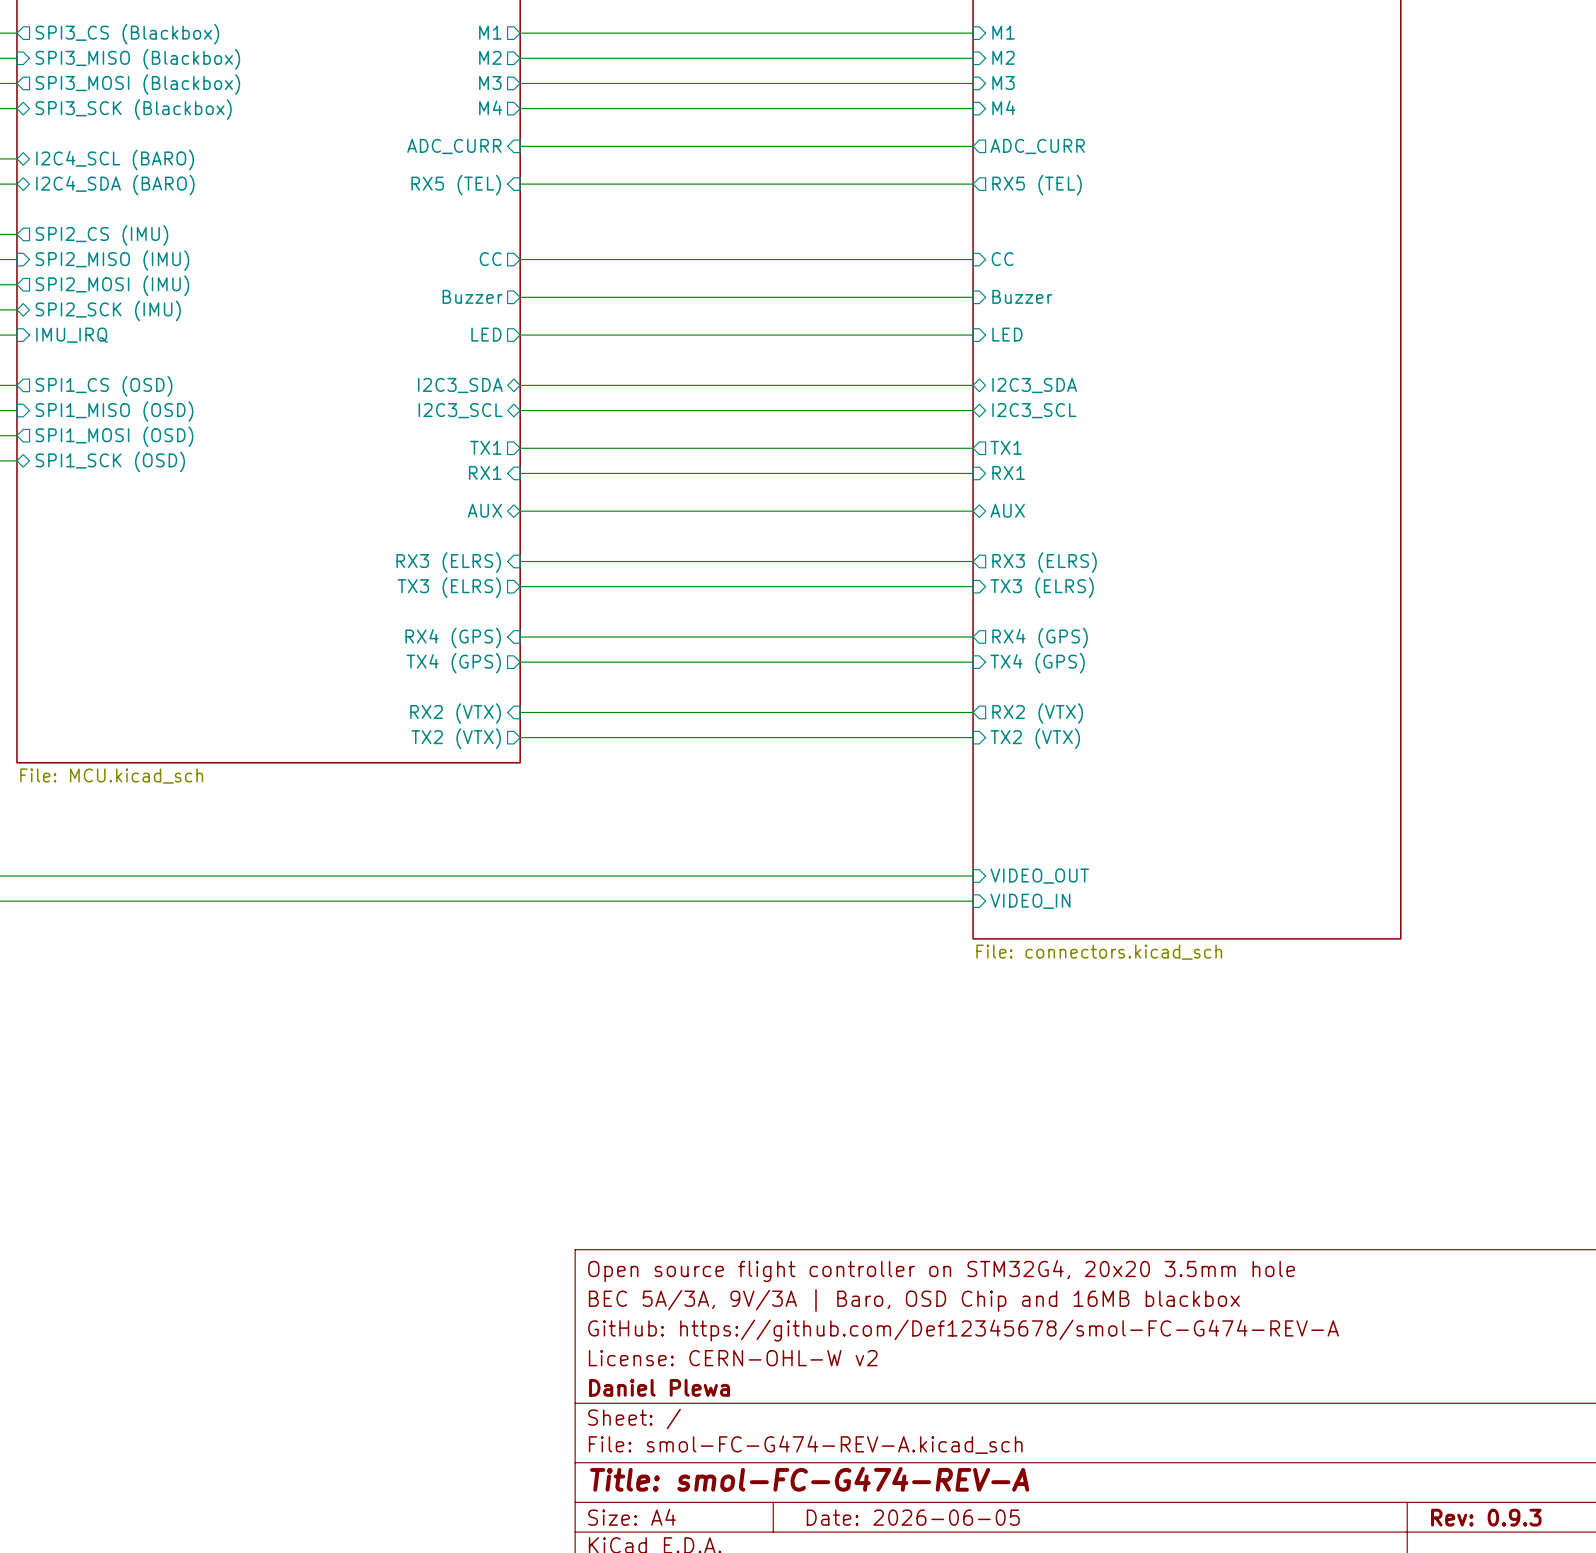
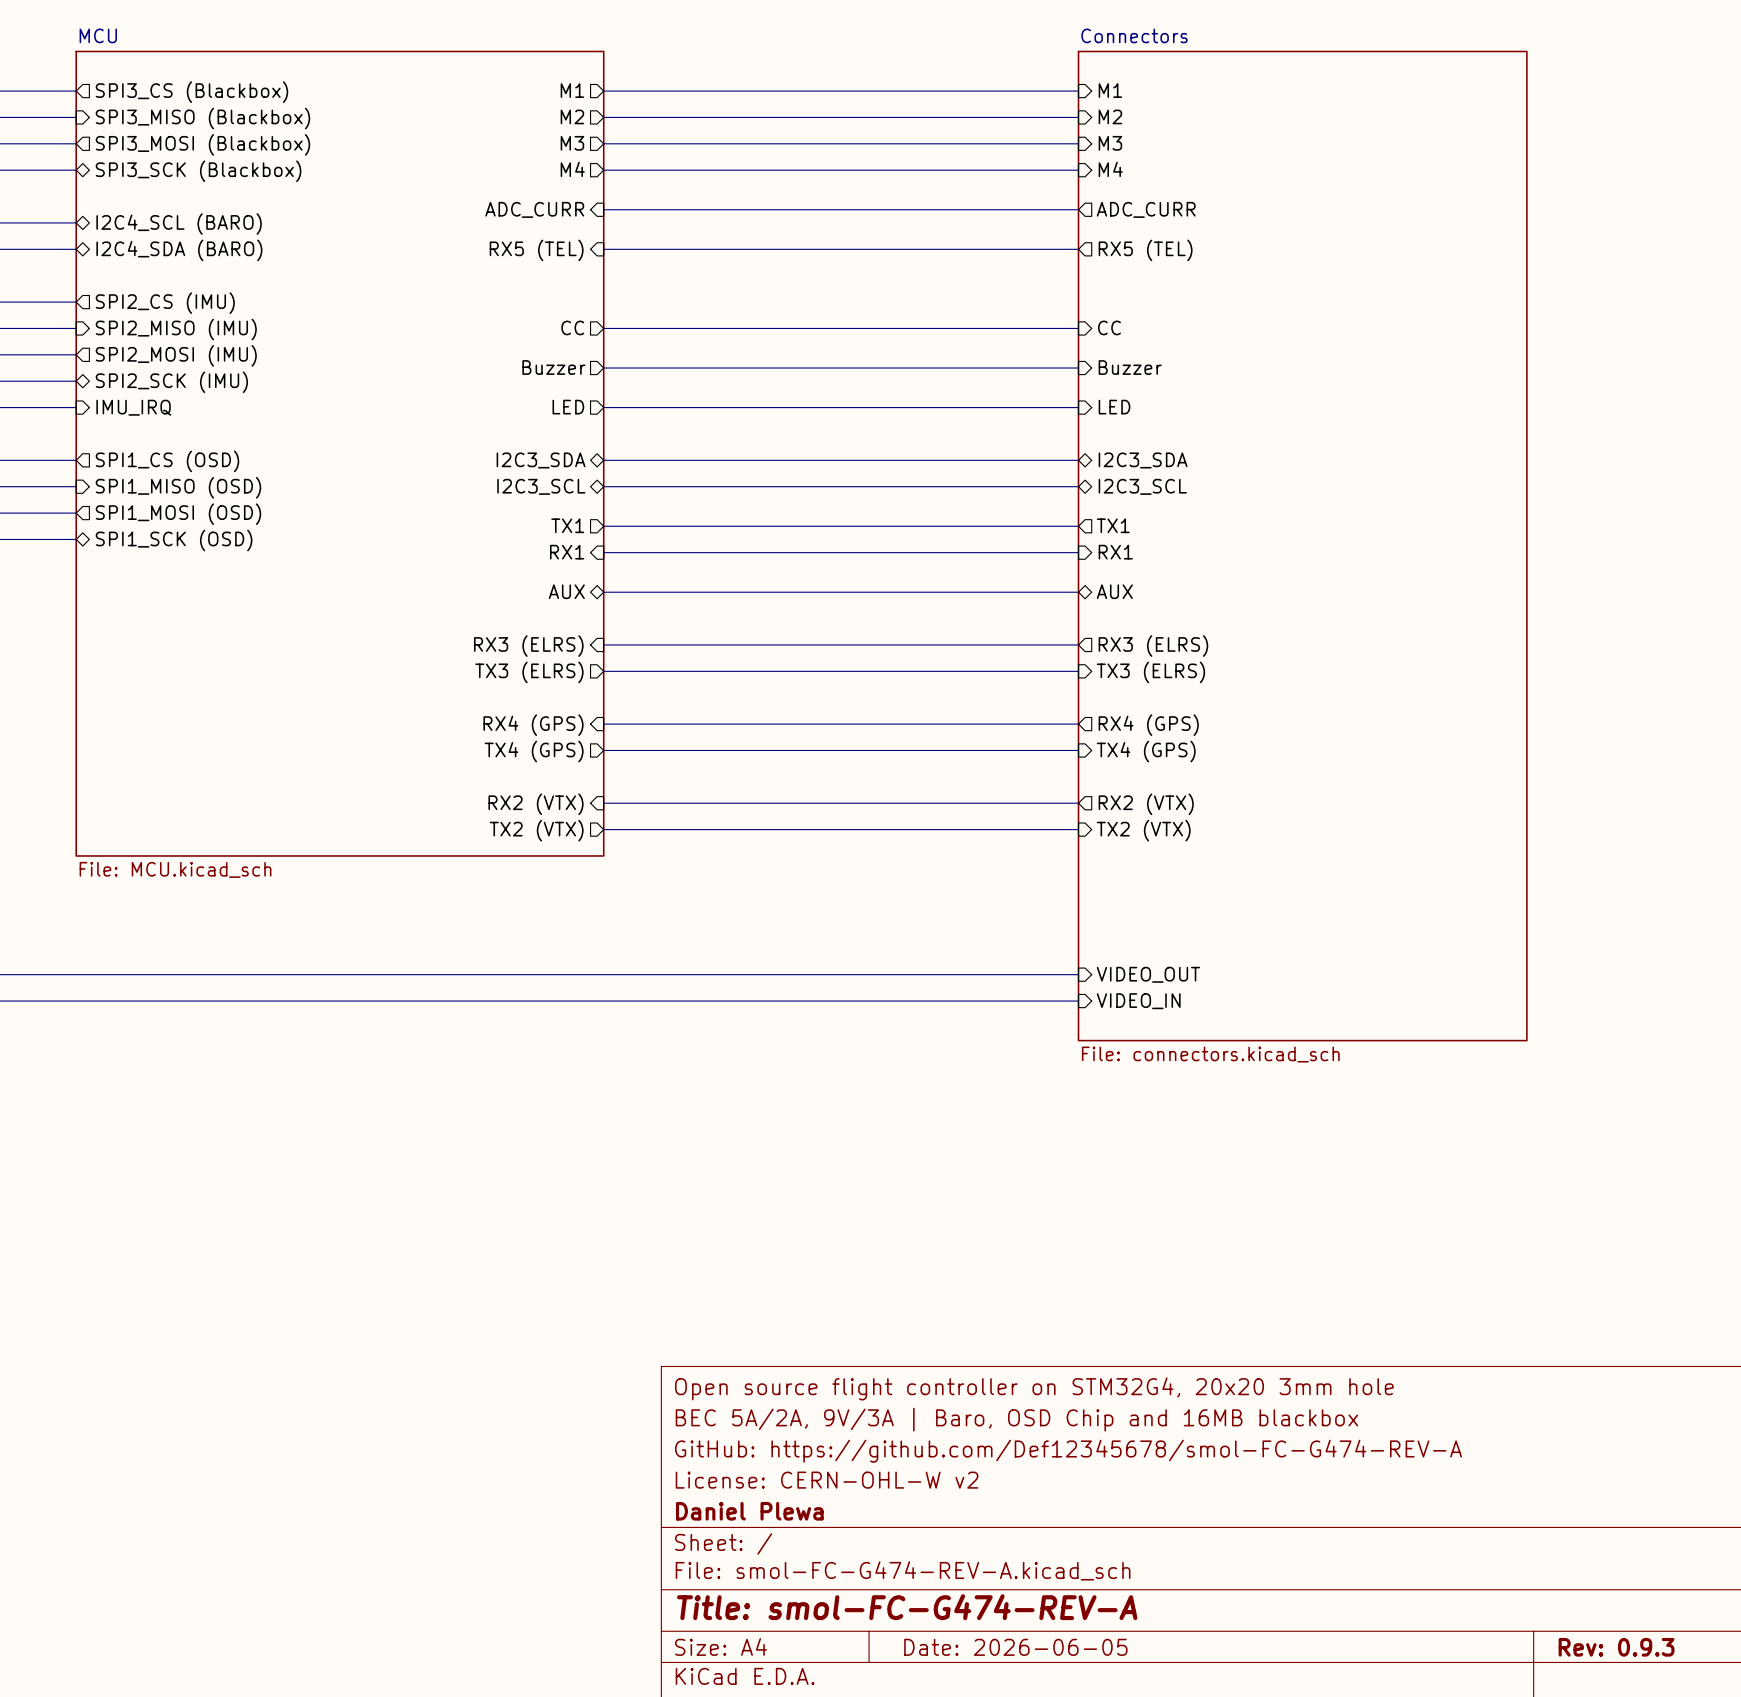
title block: Open source flight controller on STM32G4, 20x20 3.5mm hole (941, 1271) -> Open source flight controller on STM32G4, 20x20 3mm hole (1034, 1388)
title block: BEC 5A/3A, 9V/3A | Baro, OSD Chip and 16MB blackbox (914, 1300) -> BEC 5A/2A, 9V/3A | Baro, OSD Chip and 16MB blackbox (1016, 1419)

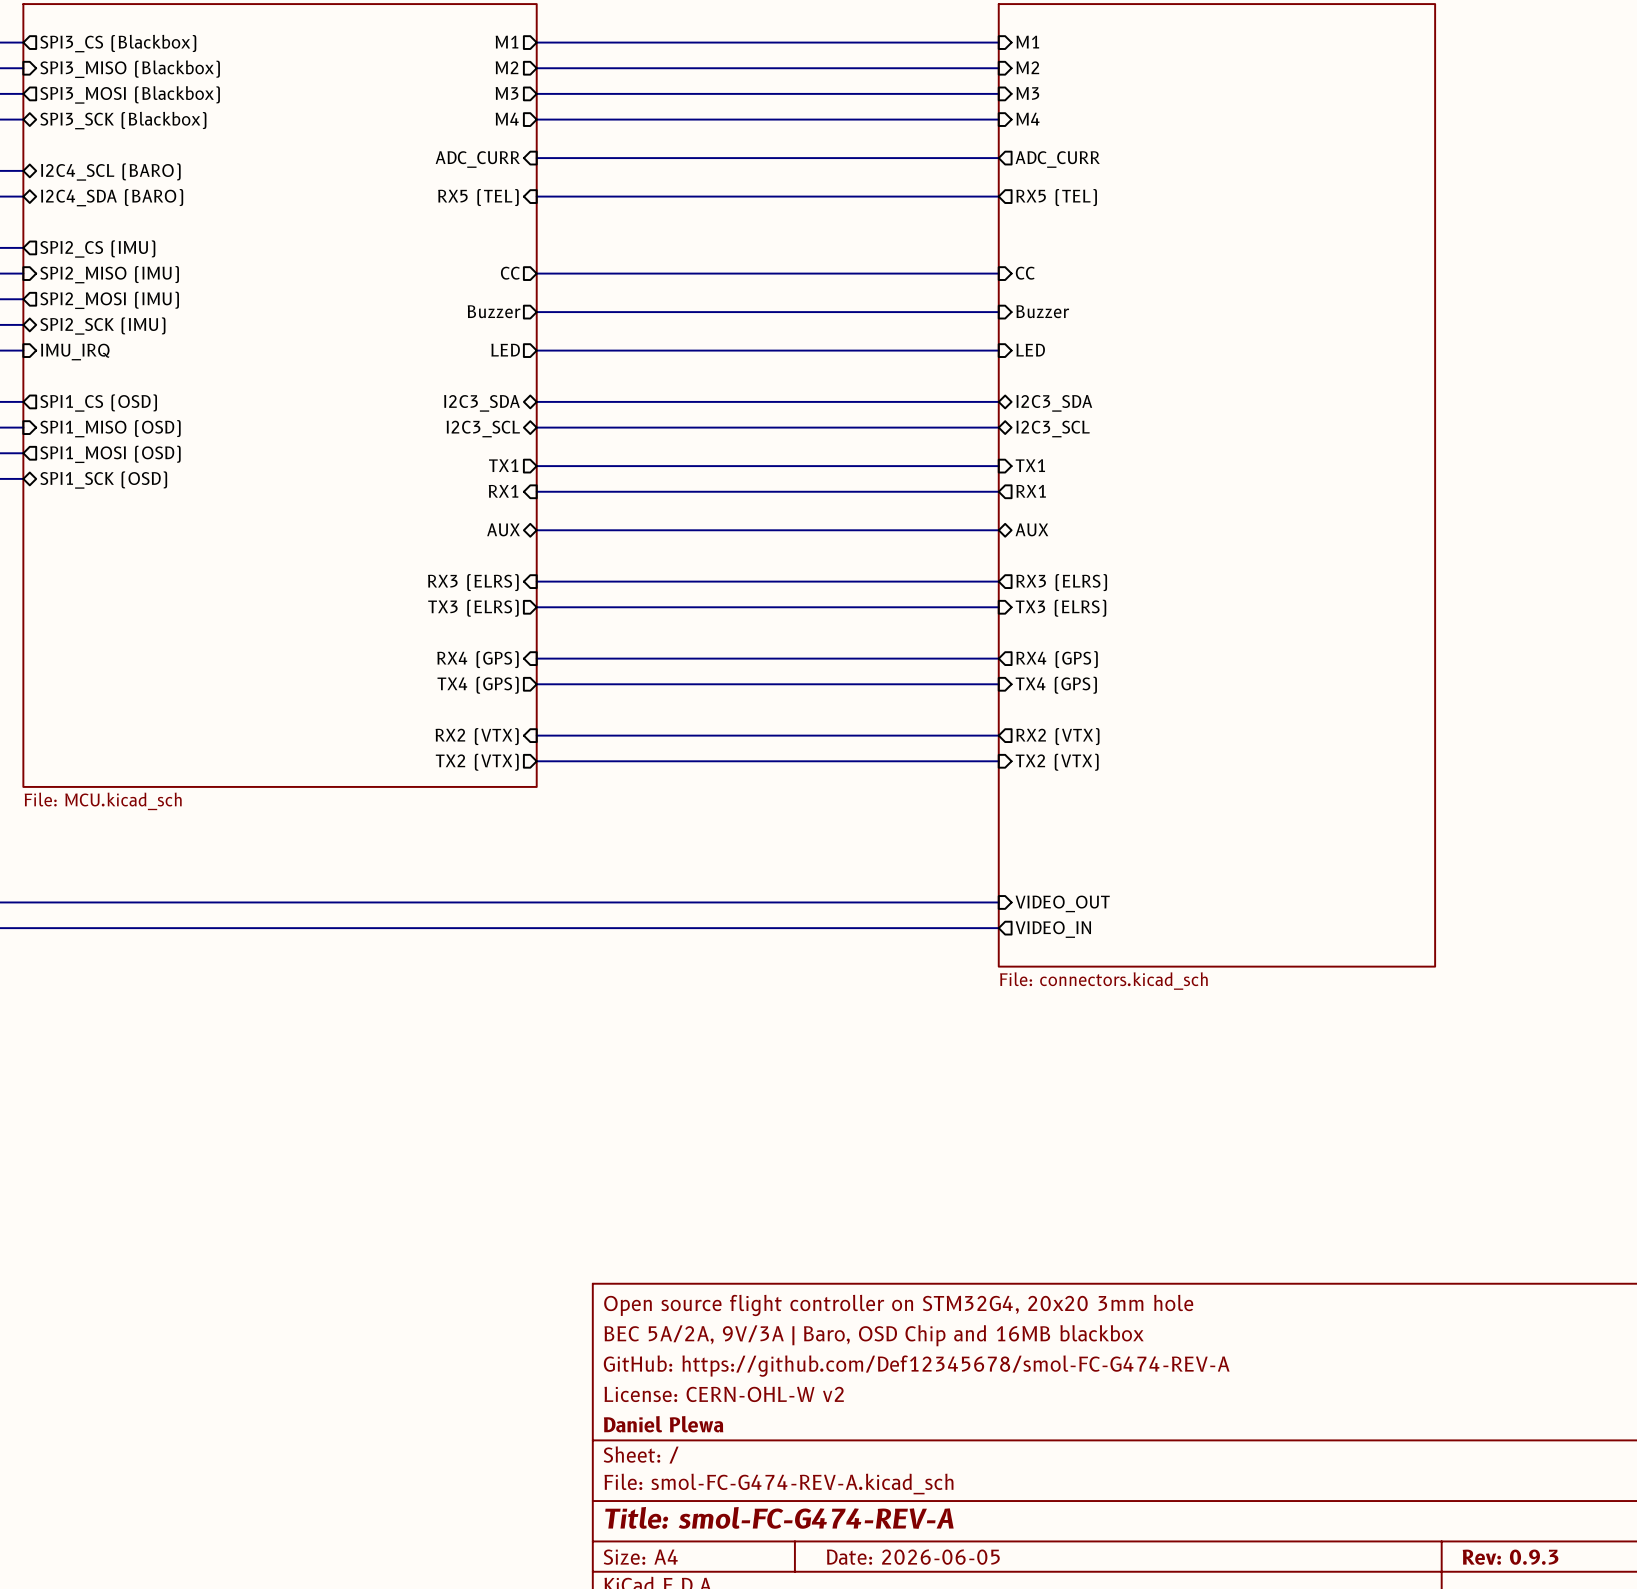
sheet pin shape: output (1113, 525) -> input (1030, 465)
sheet pin shape: input (1115, 552) -> output (1031, 491)
sheet pin shape: input (1138, 1001) -> output (1053, 929)

